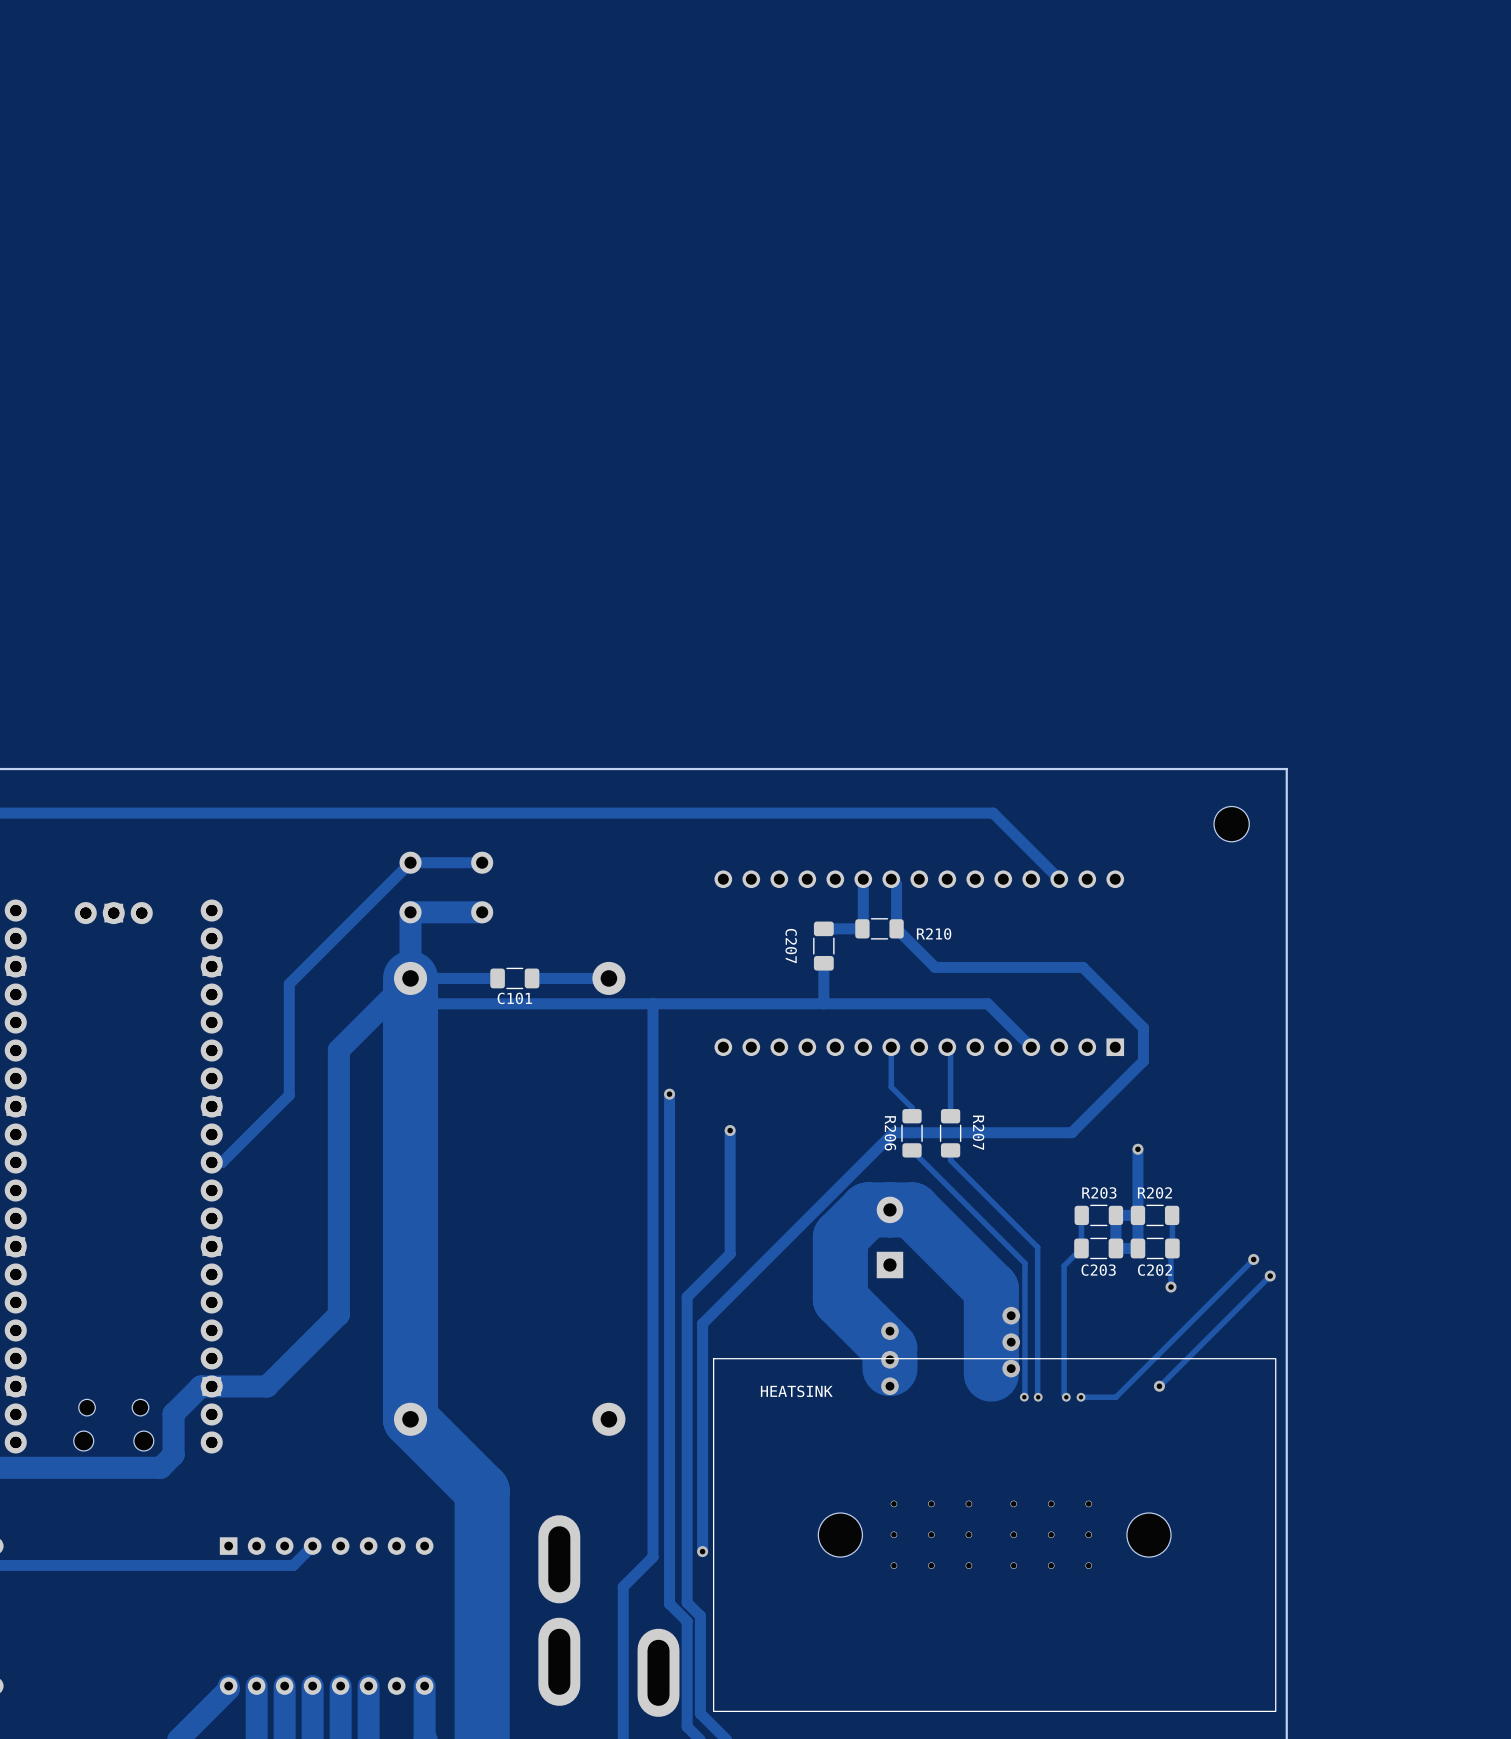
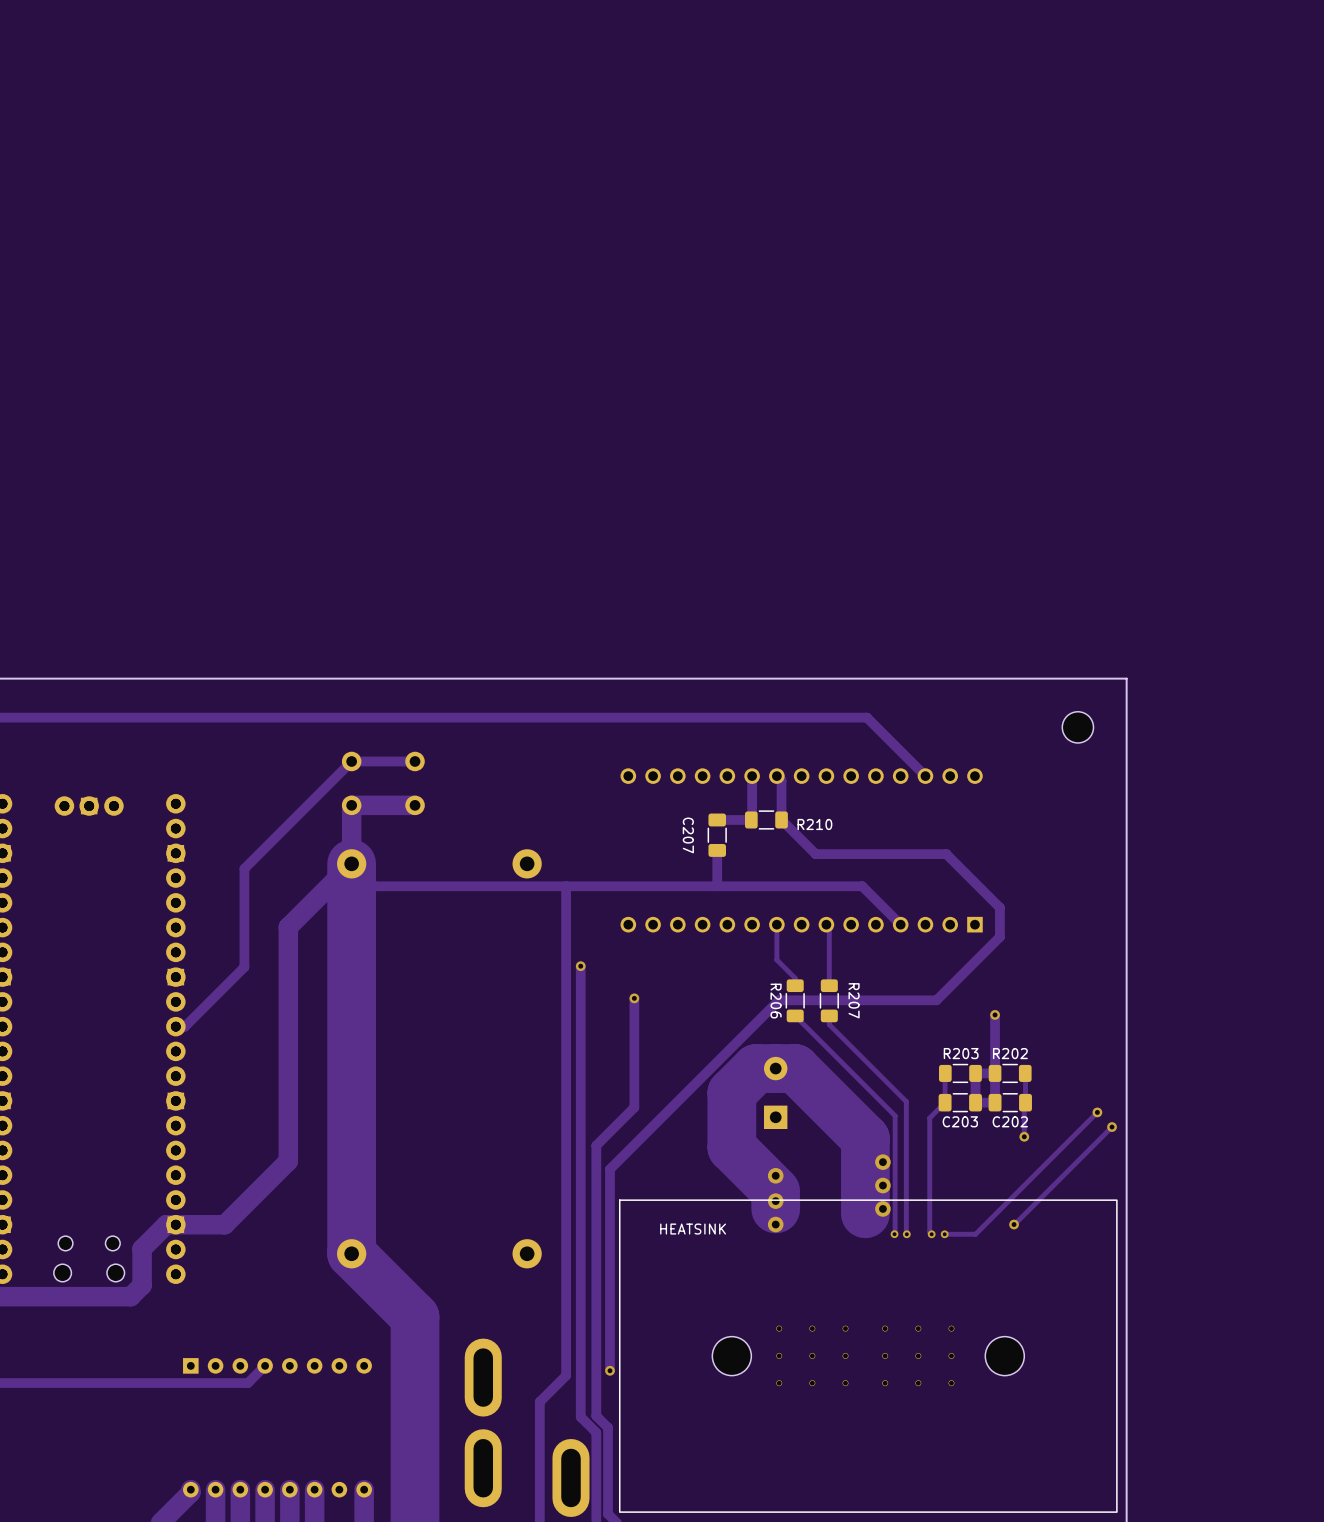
track: (497, 978) (410, 978) -> none
C101: (514, 978) -> none
track: (608, 978) (532, 978) -> none

